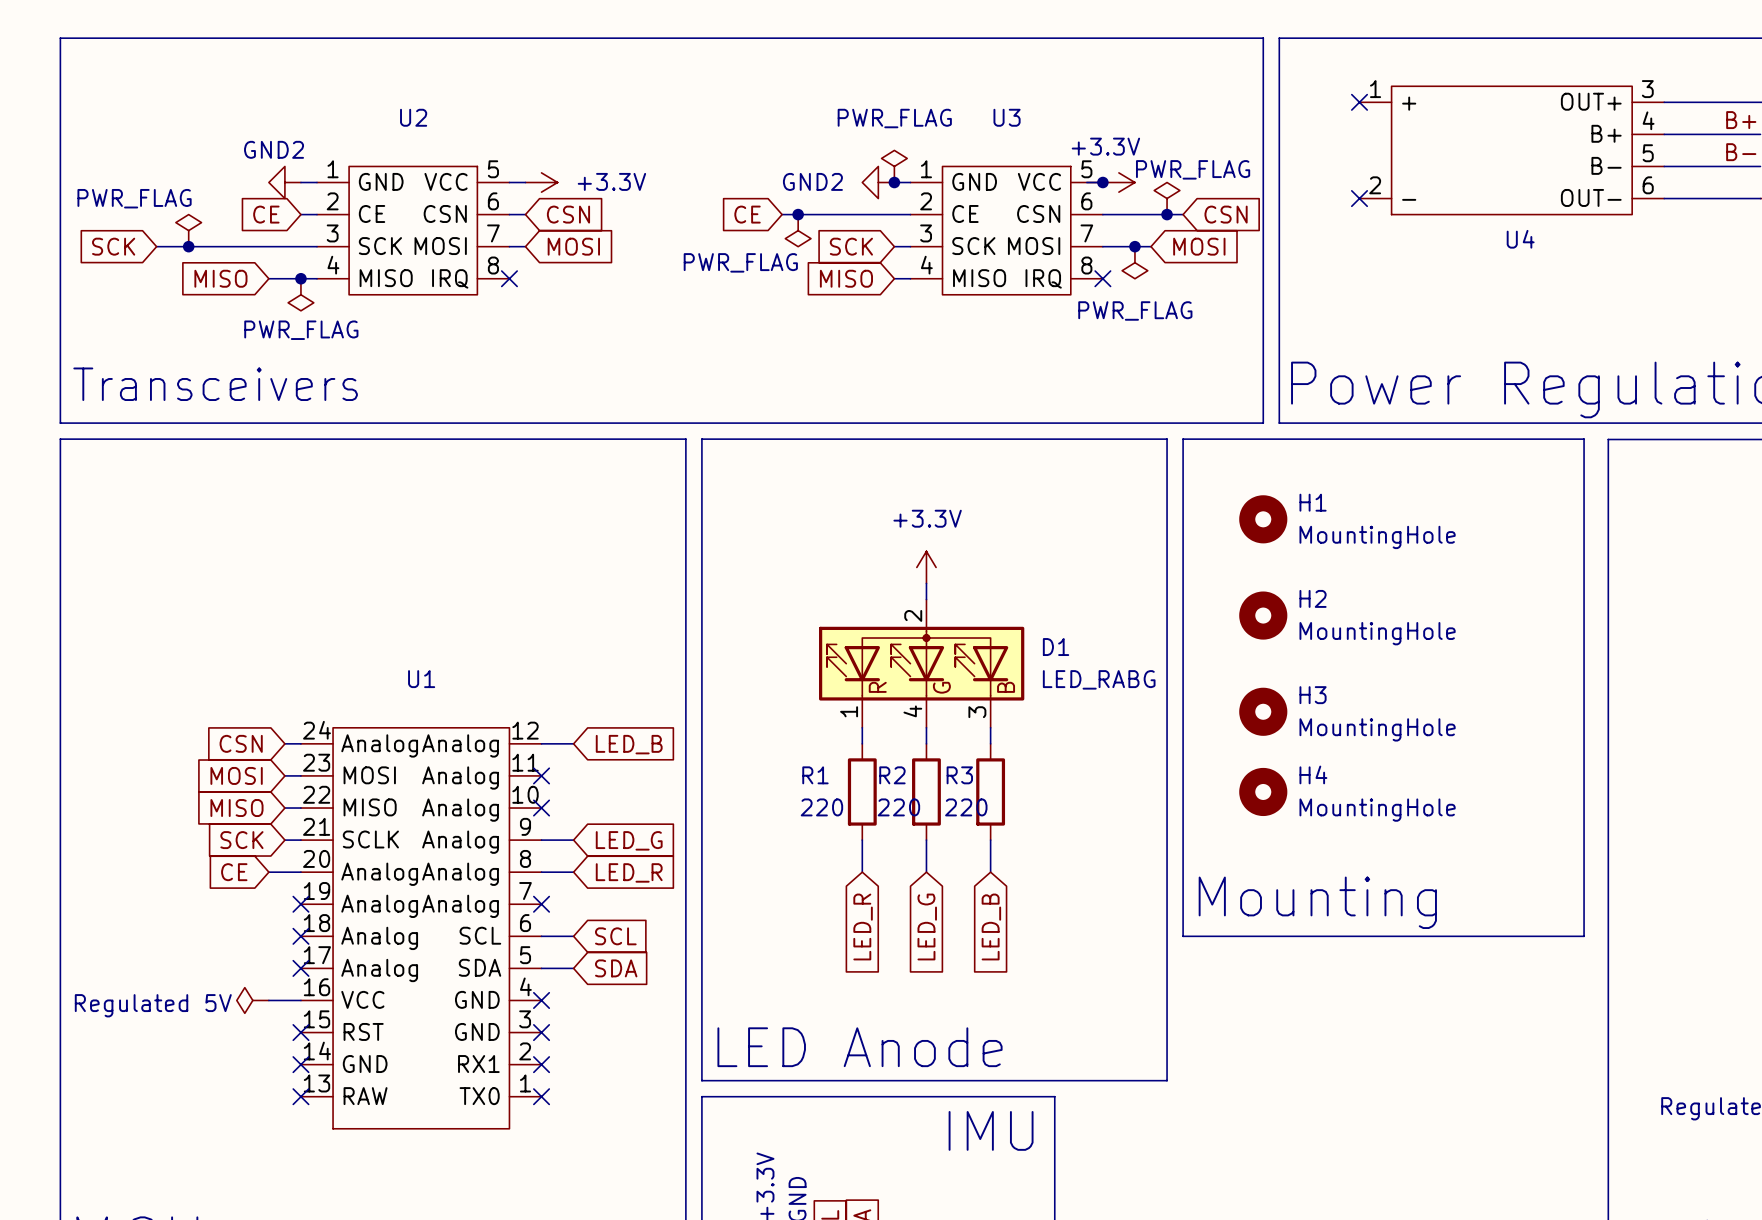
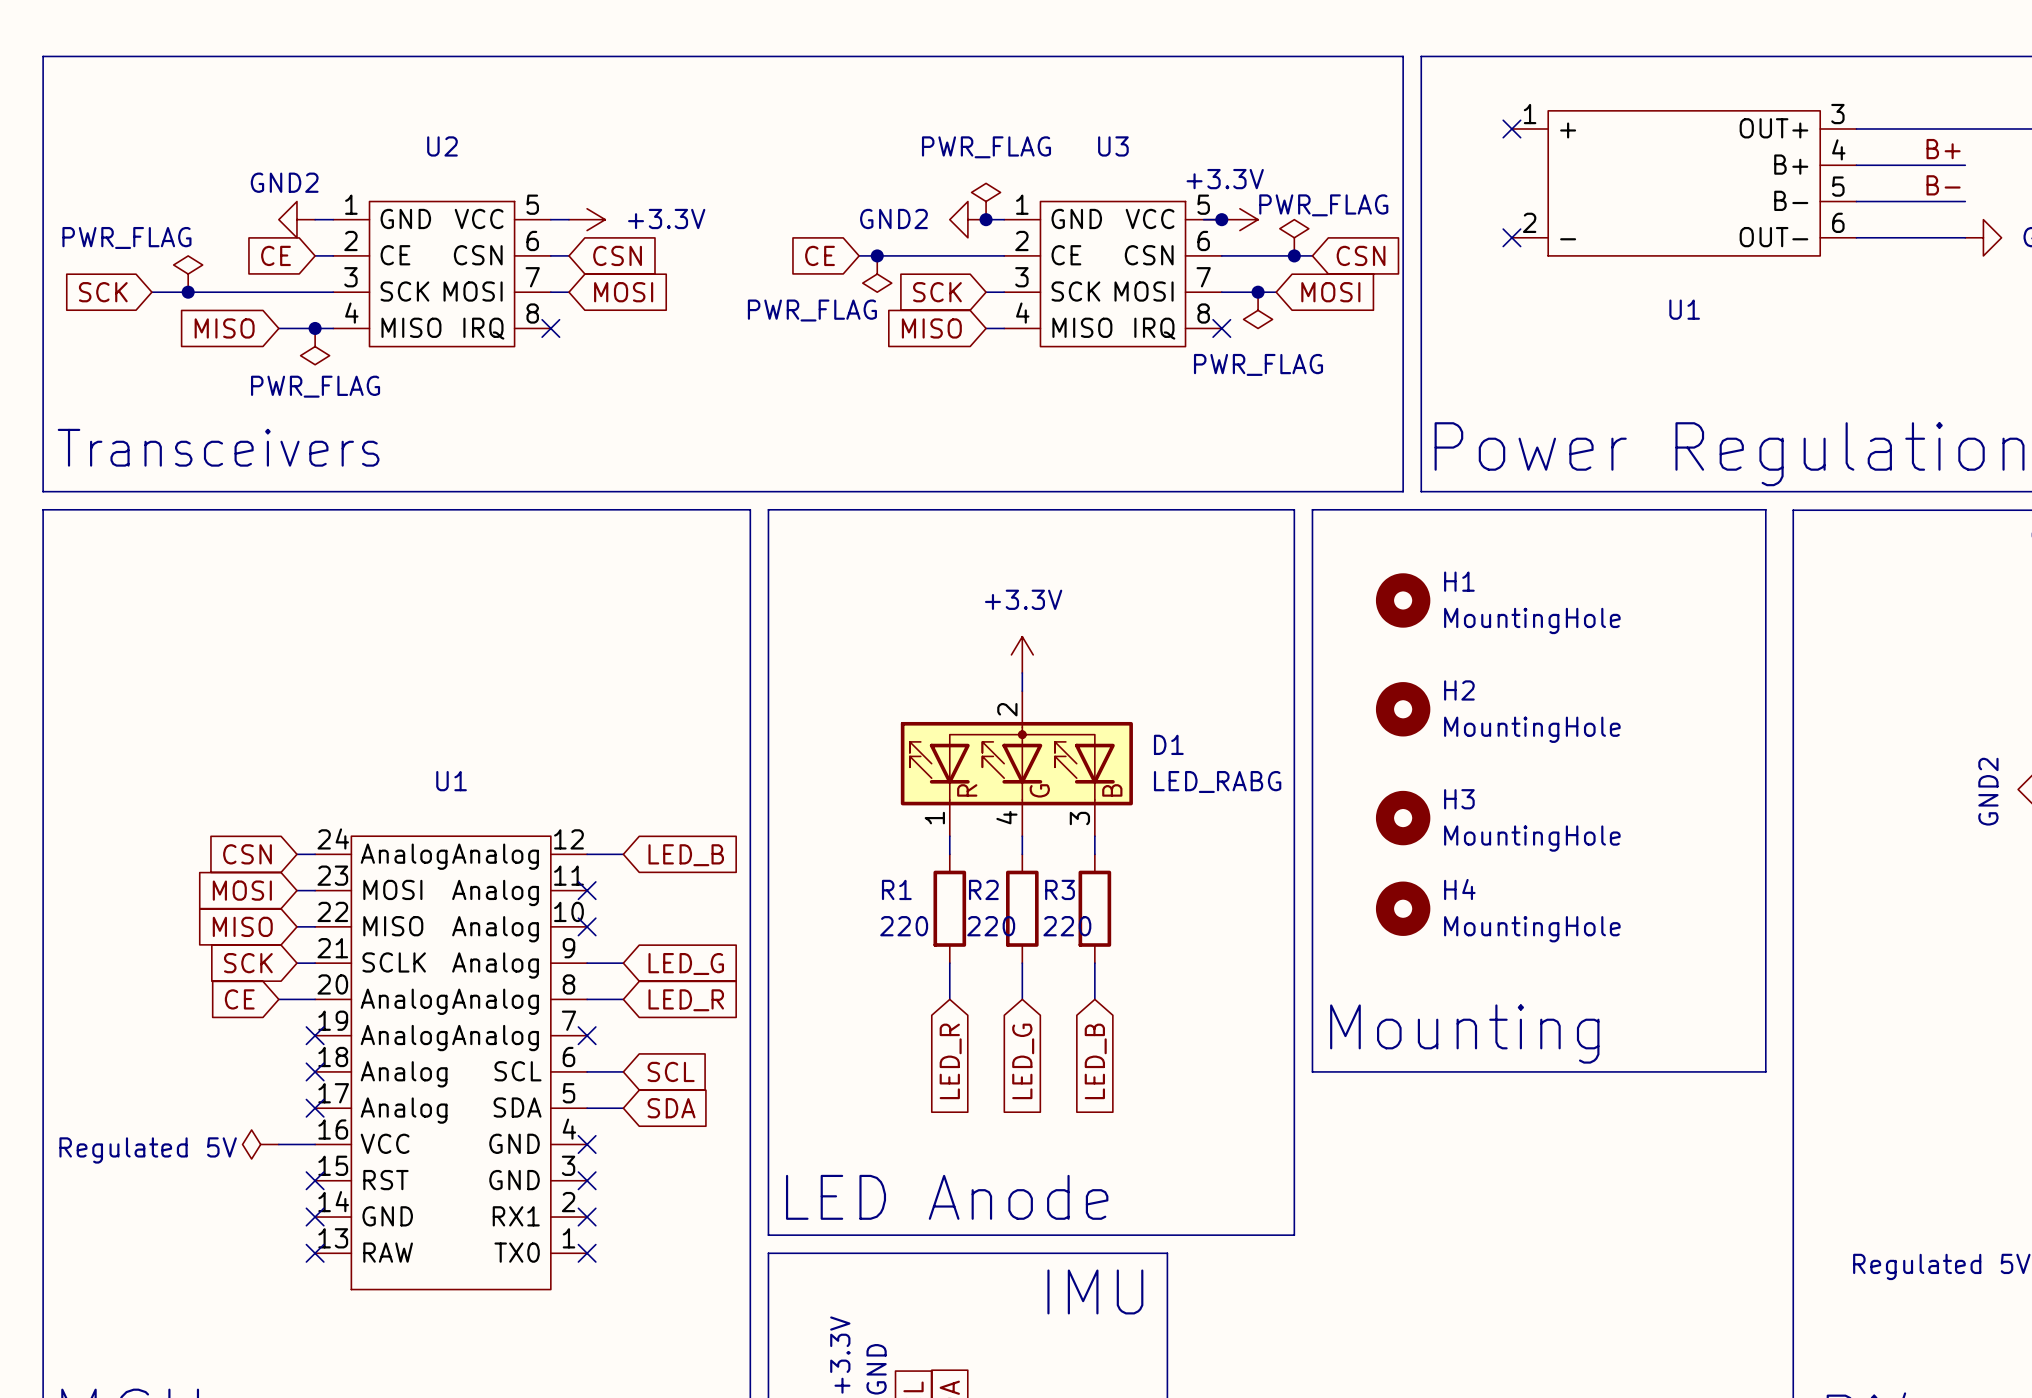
U4 name: U4 (1520, 239) -> U1 (1684, 309)

